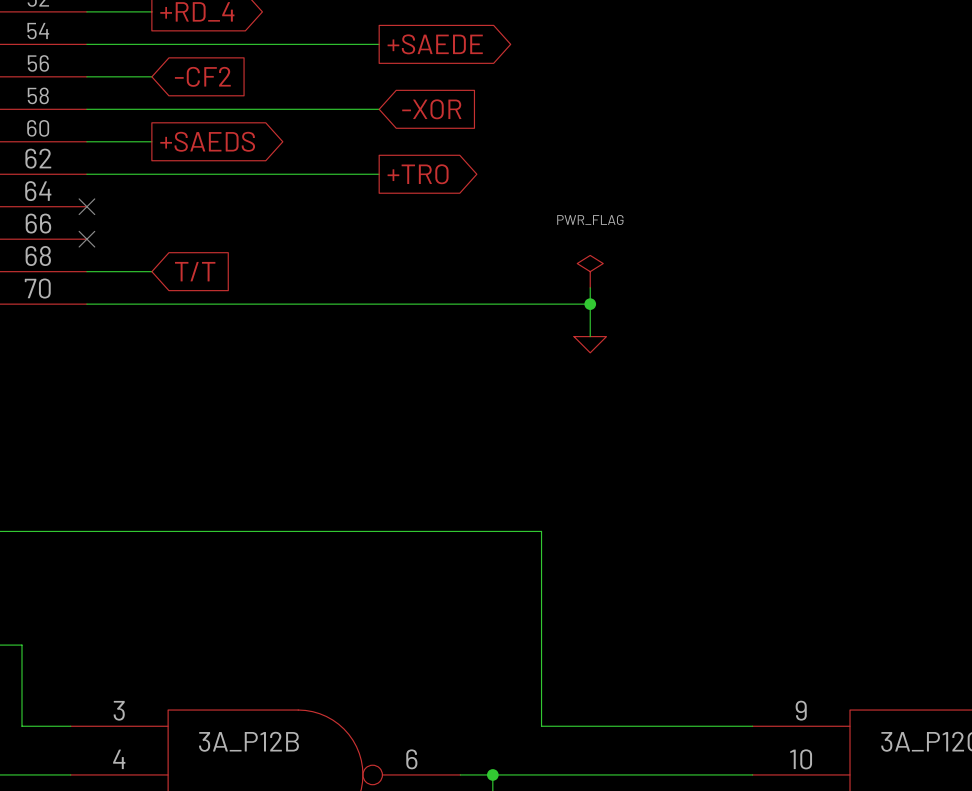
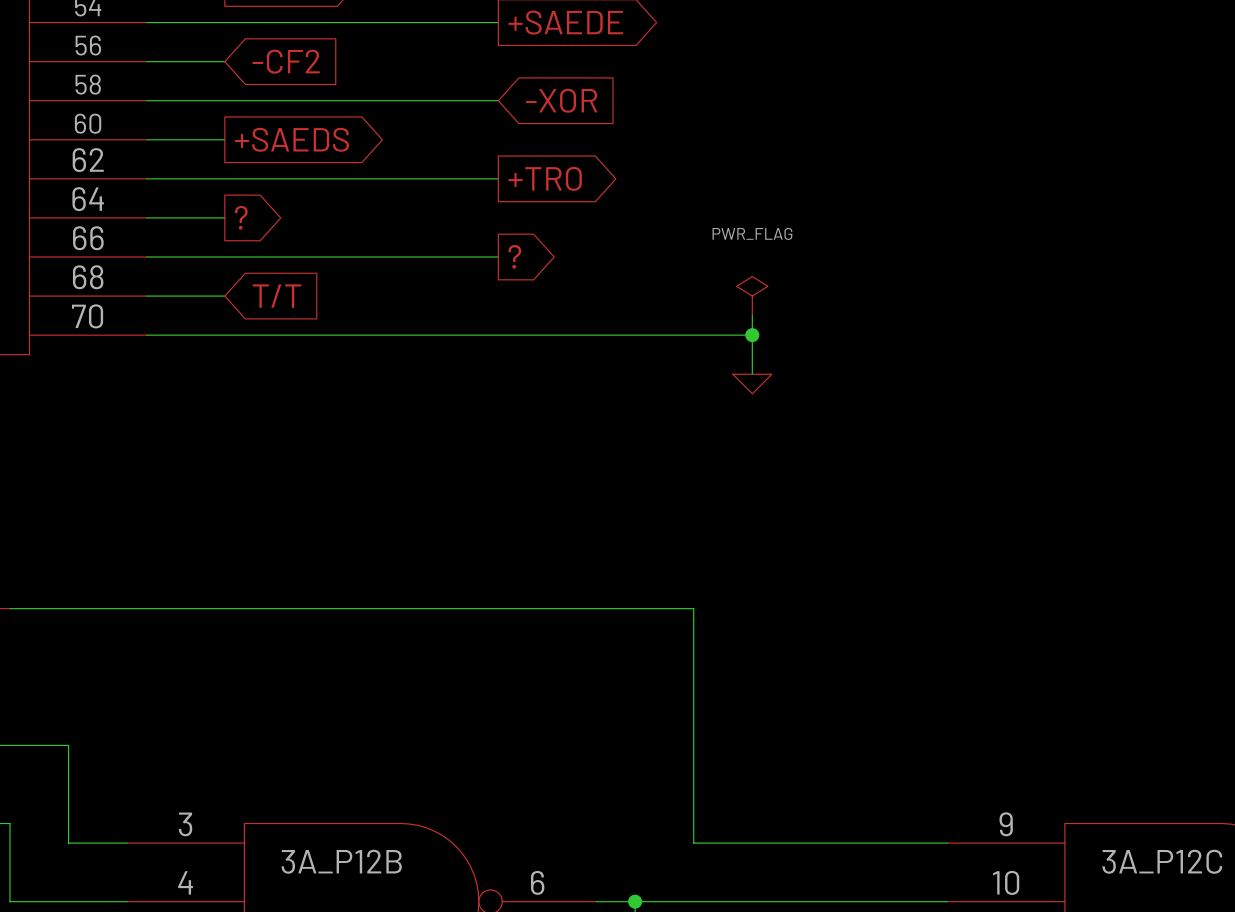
wire: none -> (146, 217) (224, 217)
no-connect mark: (86, 206) -> none
global label: none -> ? (241, 217)
wire: none -> (146, 257) (498, 257)
no-connect mark: (86, 239) -> none
global label: none -> ? (514, 256)

